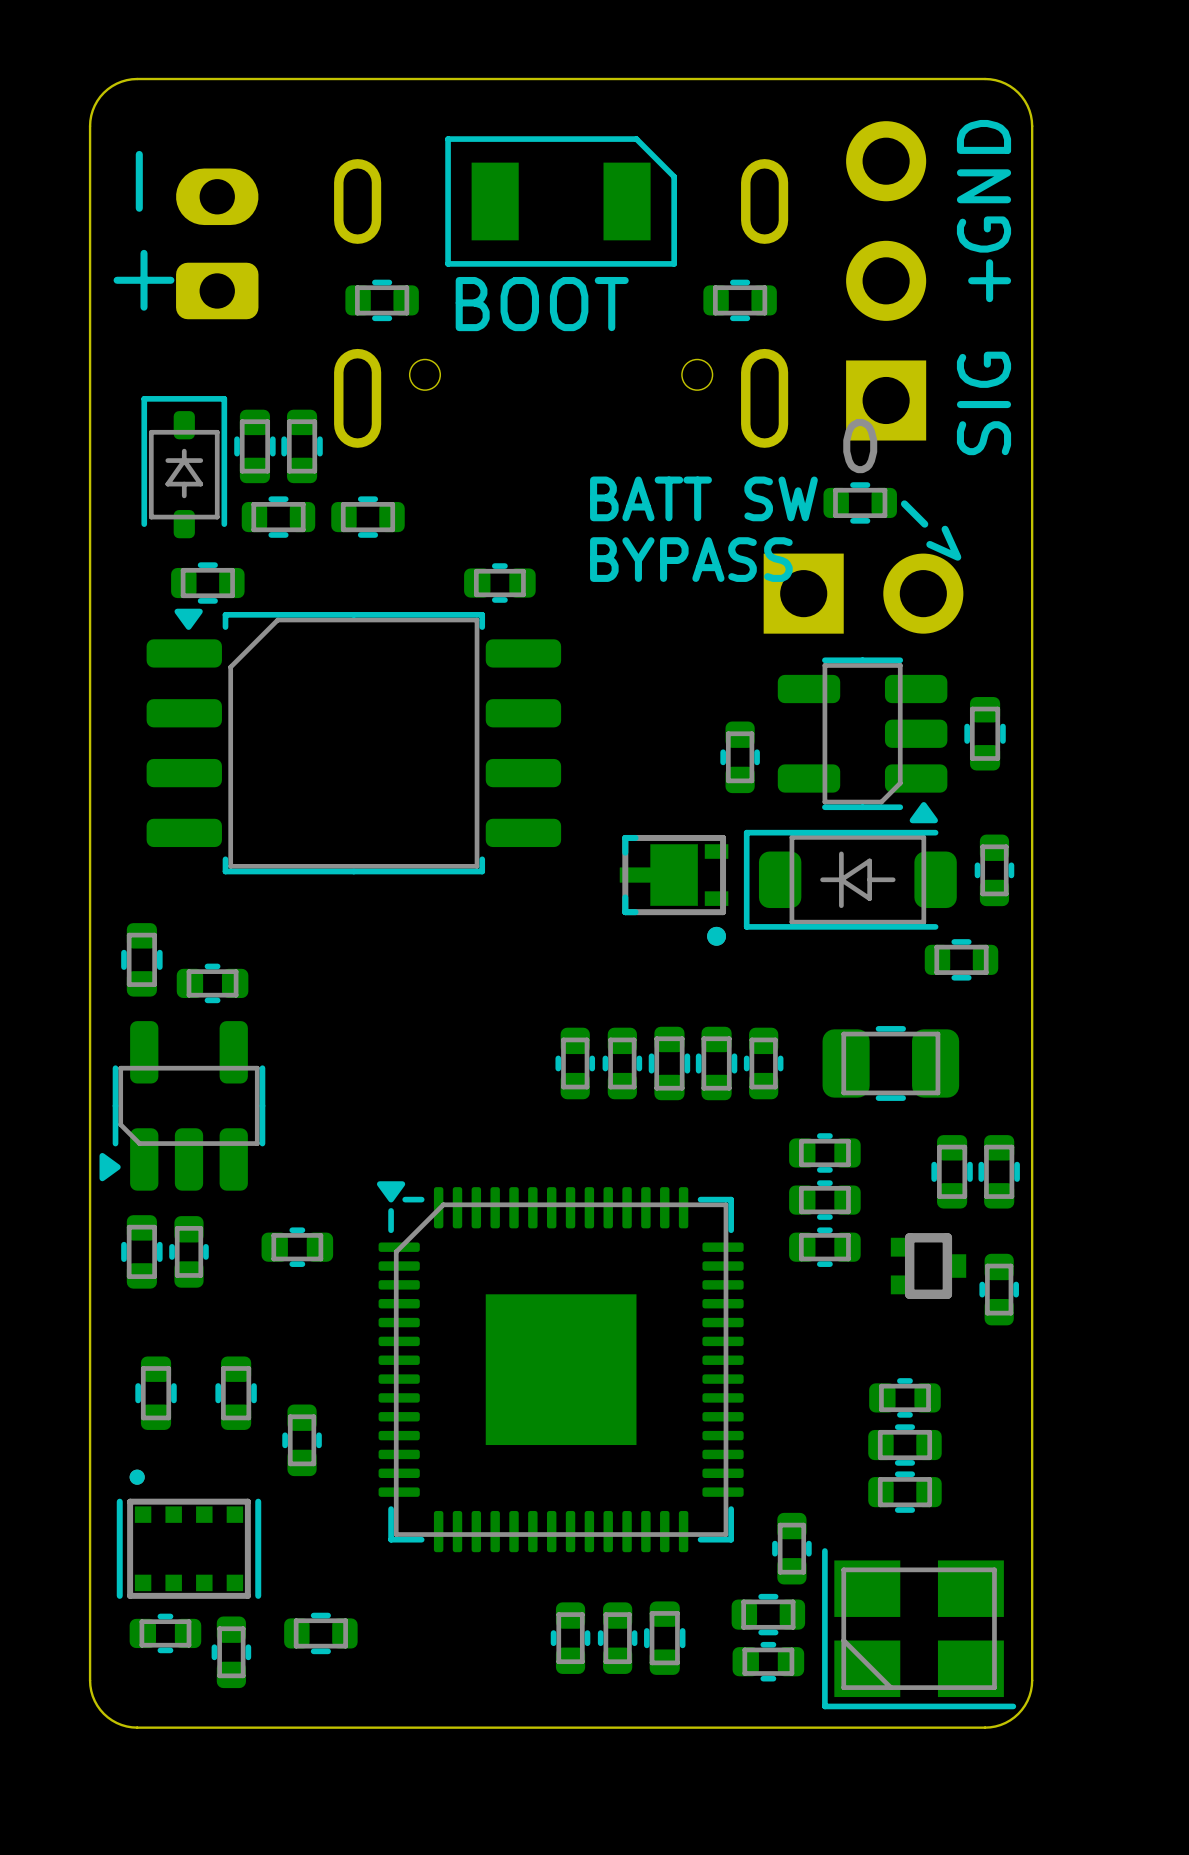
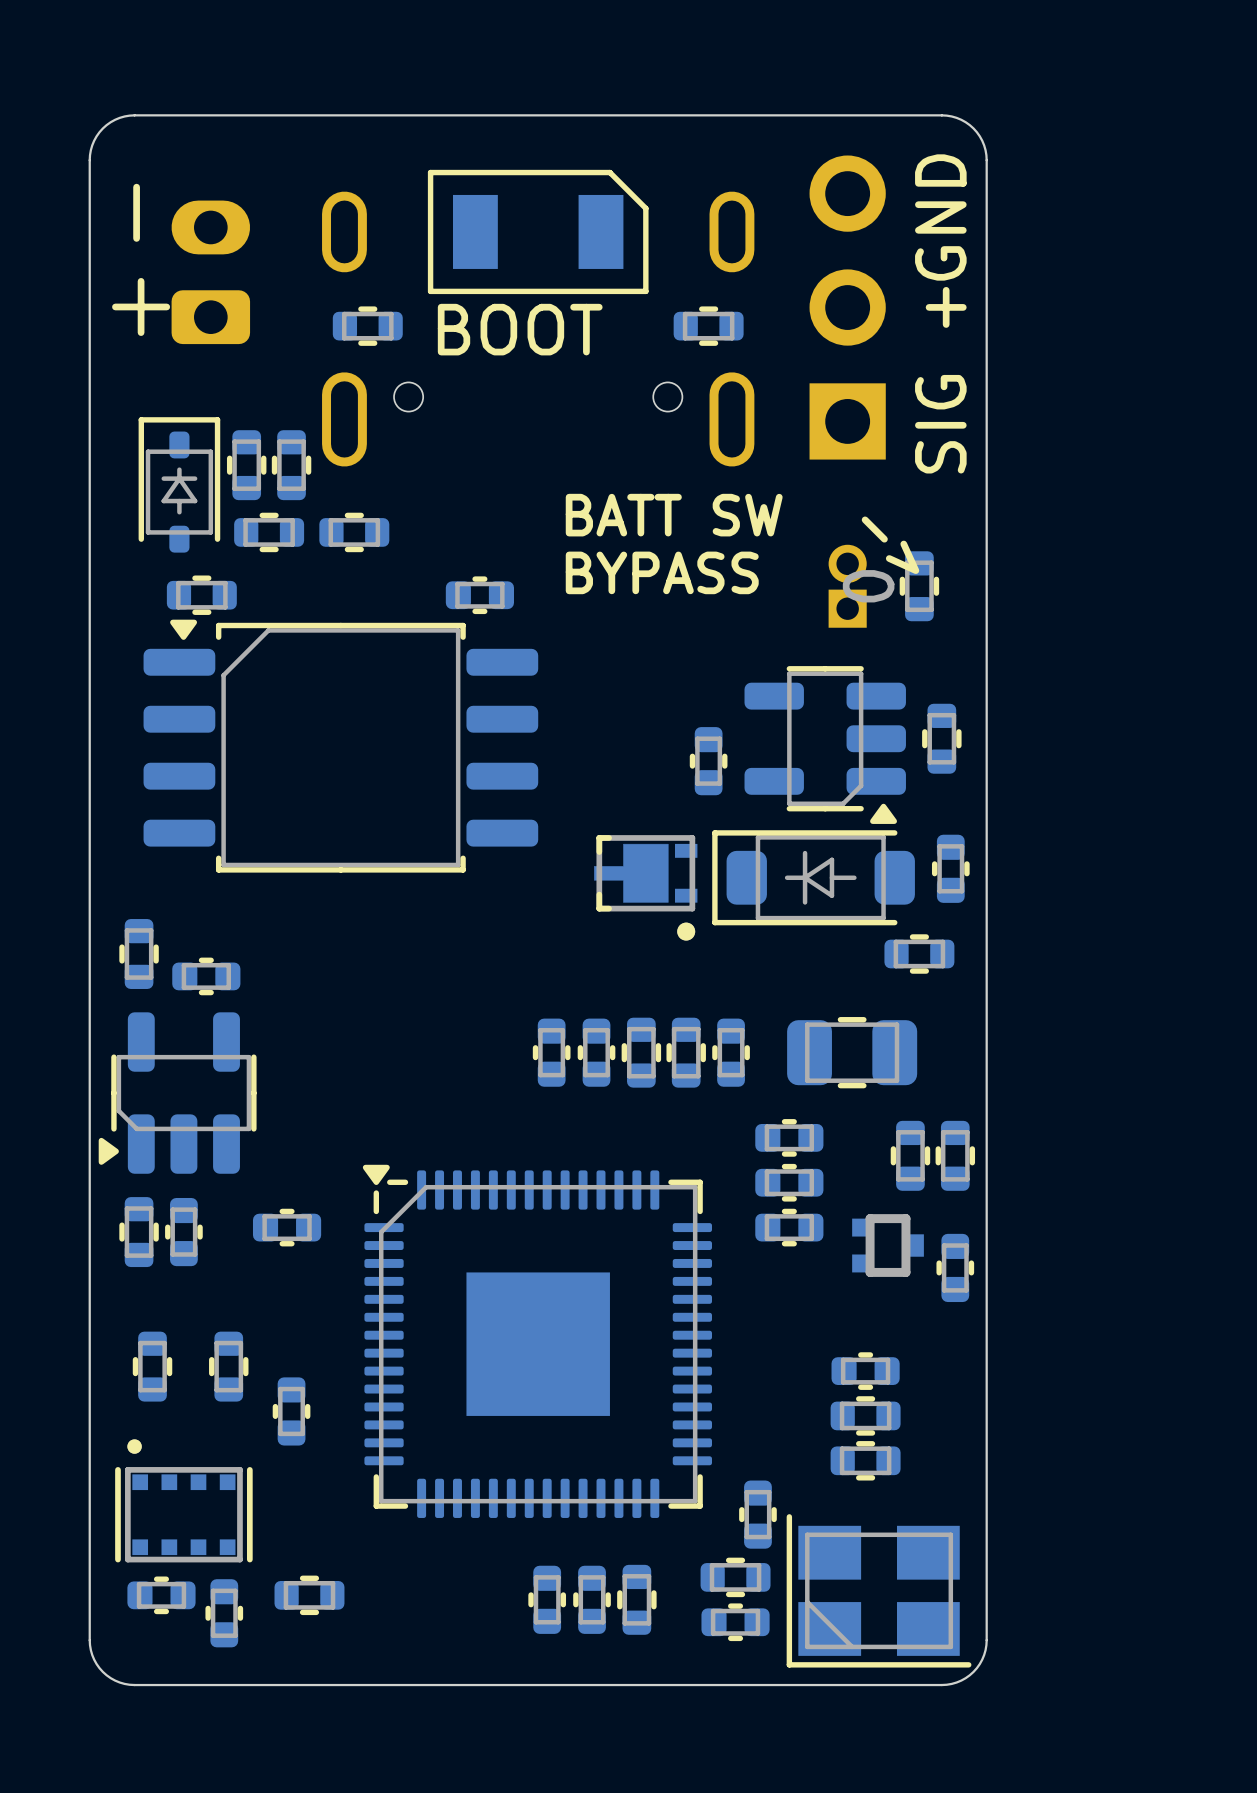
part rotation: 0° (860, 502) -> 90° clockwise (919, 586)
part position: (860, 502) -> (919, 586)
part footprint: [763, 553, 964, 634] -> [828, 544, 867, 628]

